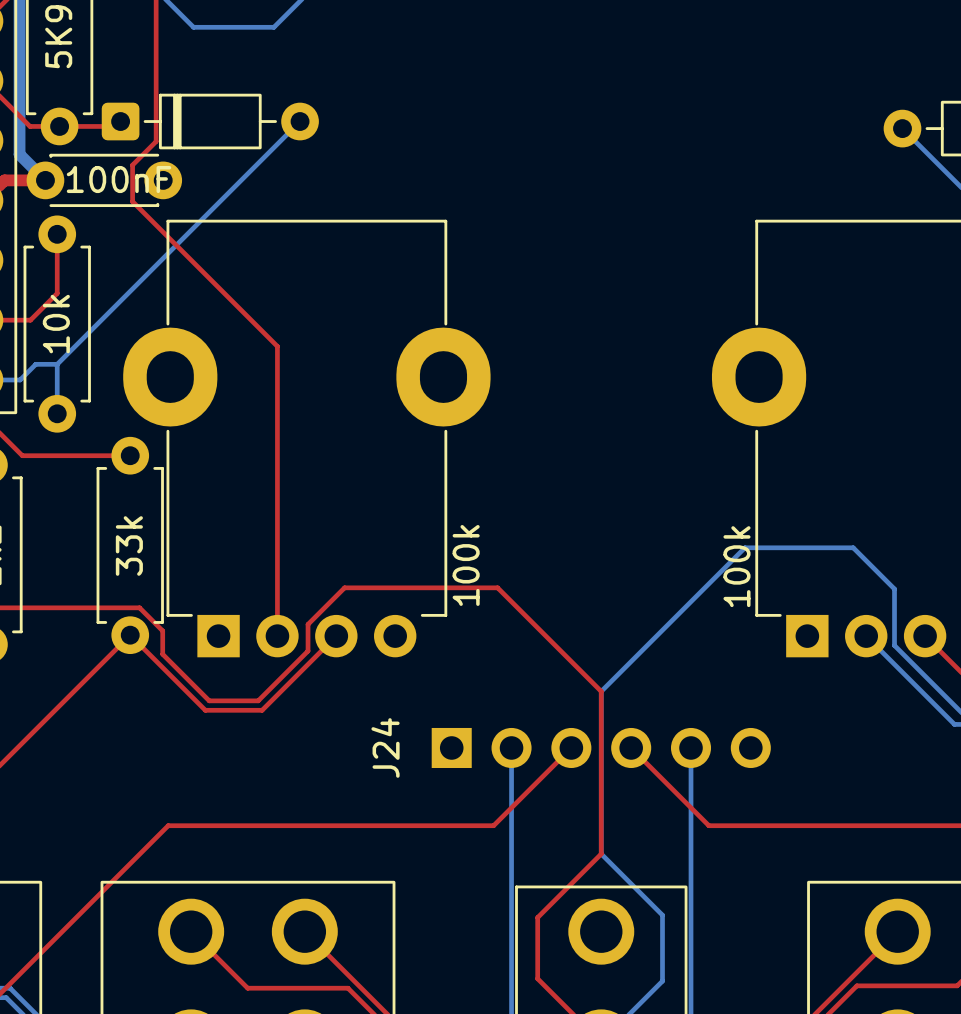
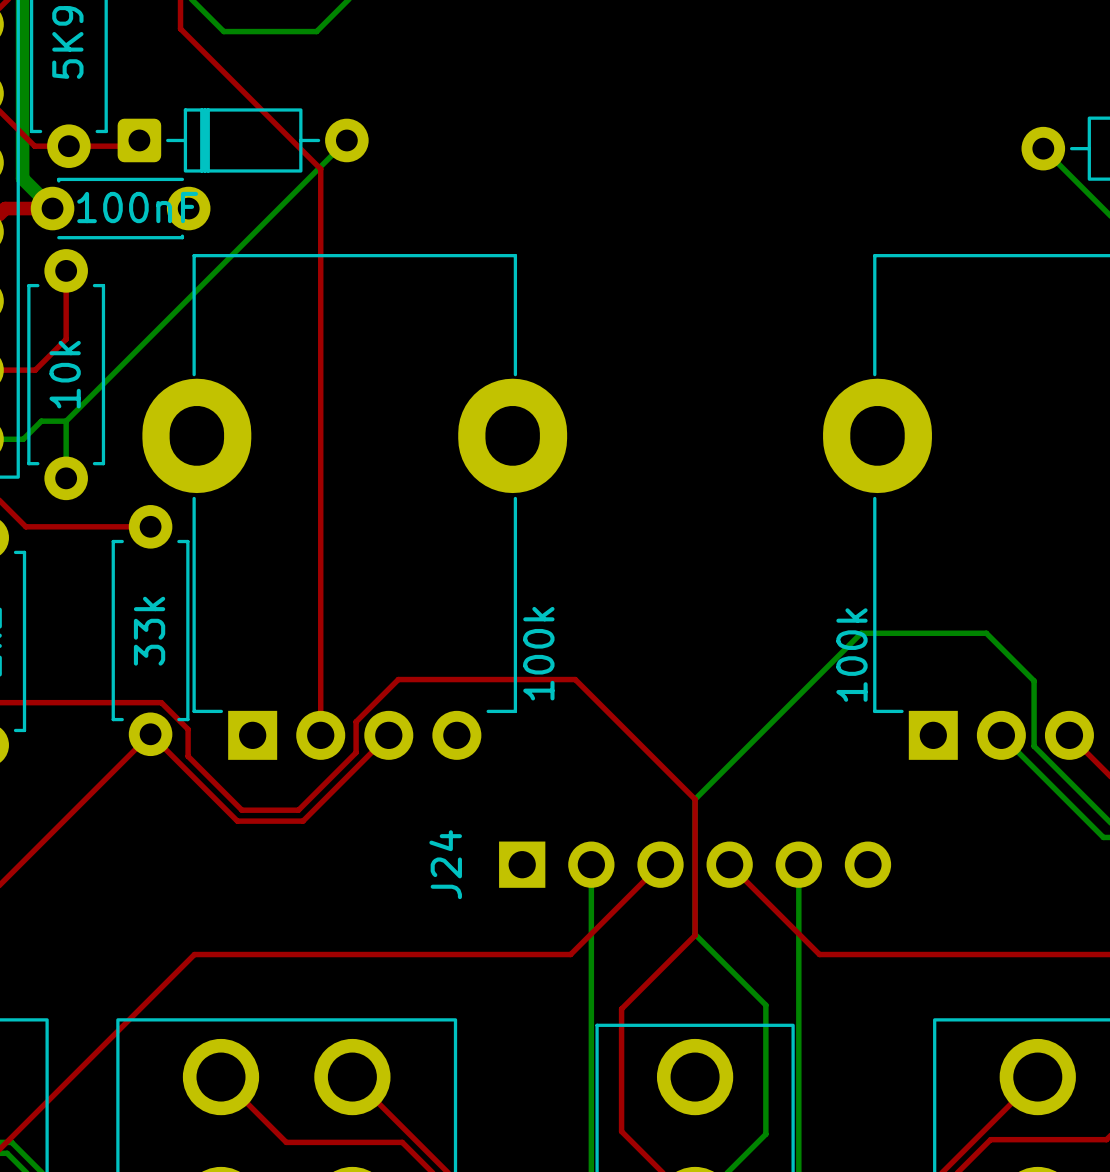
top track: (156, 24) (156, 141) (132, 165) (132, 201) (277, 346) -> (180, 28) (320, 169) (320, 400)
bottom track: (601, 808) (601, 853) (662, 915) -> (695, 934) (765, 1005) (765, 1057)
top track: (601, 809) (601, 853) (537, 917) -> (695, 935) (621, 1008) (621, 1060)

